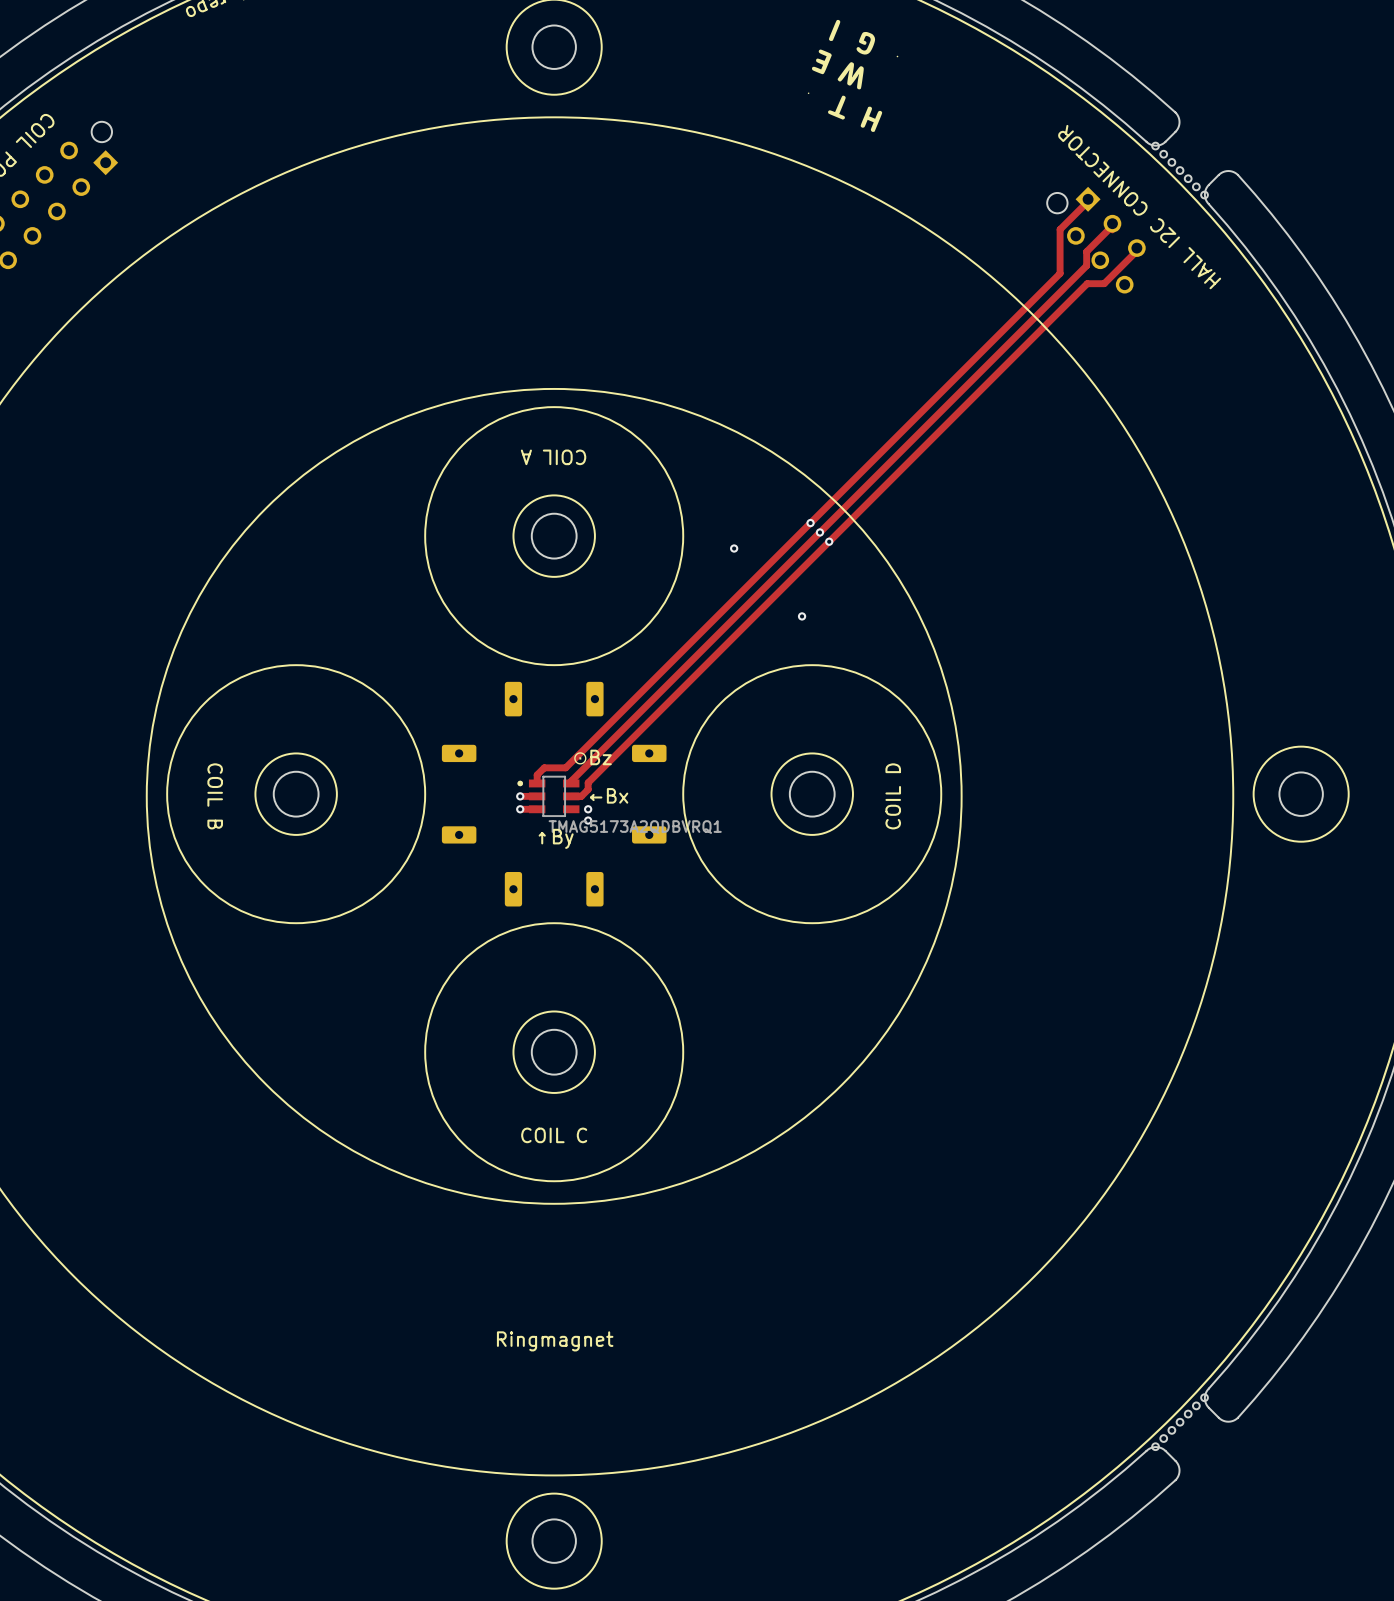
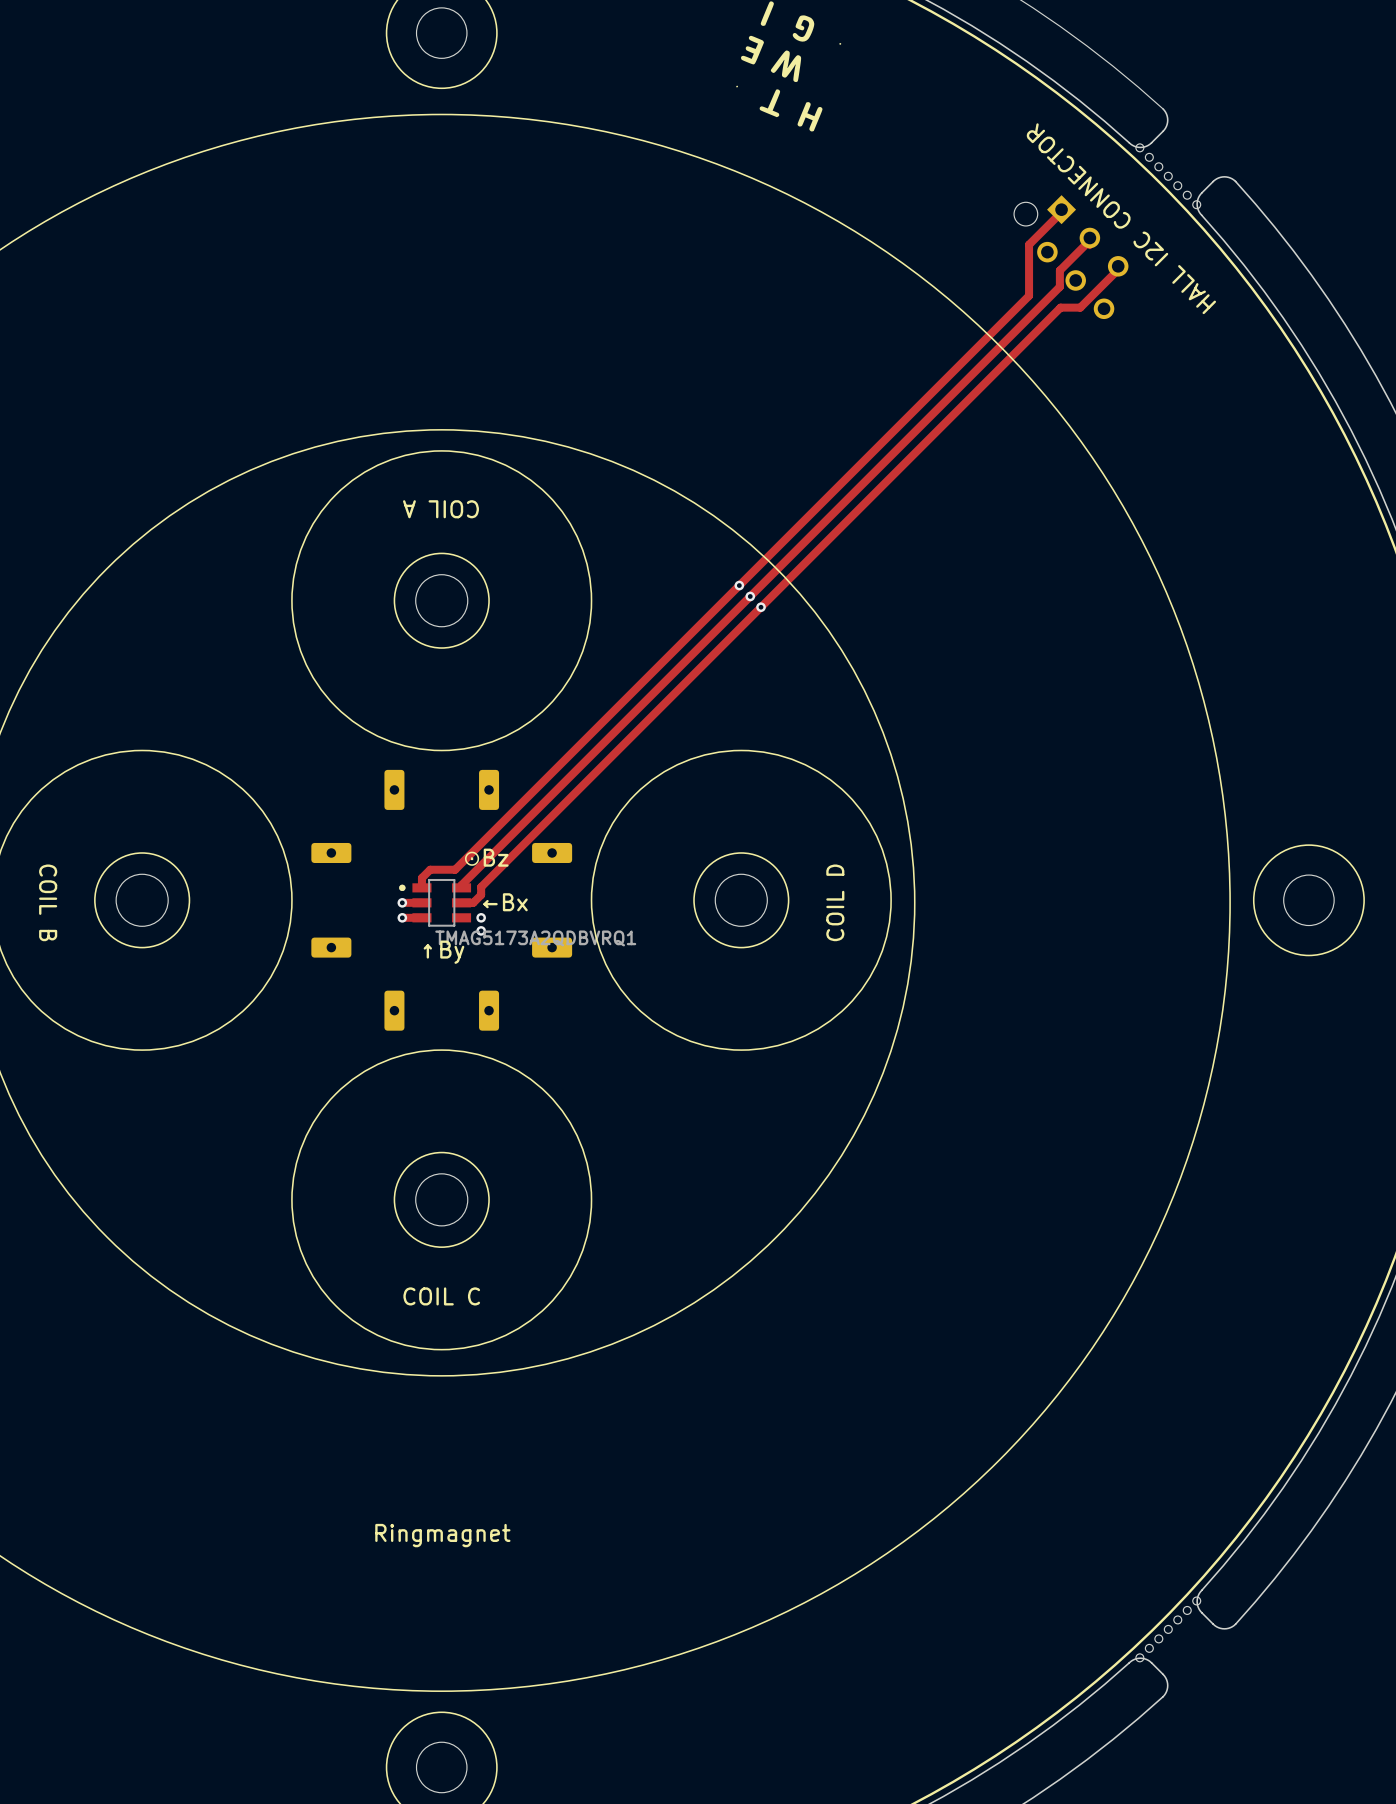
via: (734, 548) -> none
via: (802, 616) -> none

